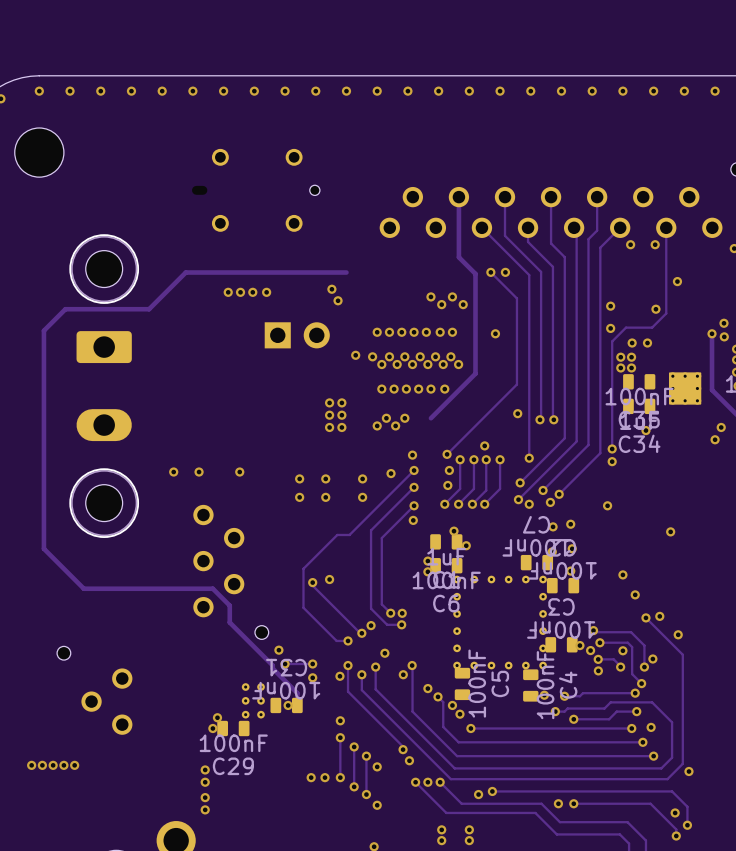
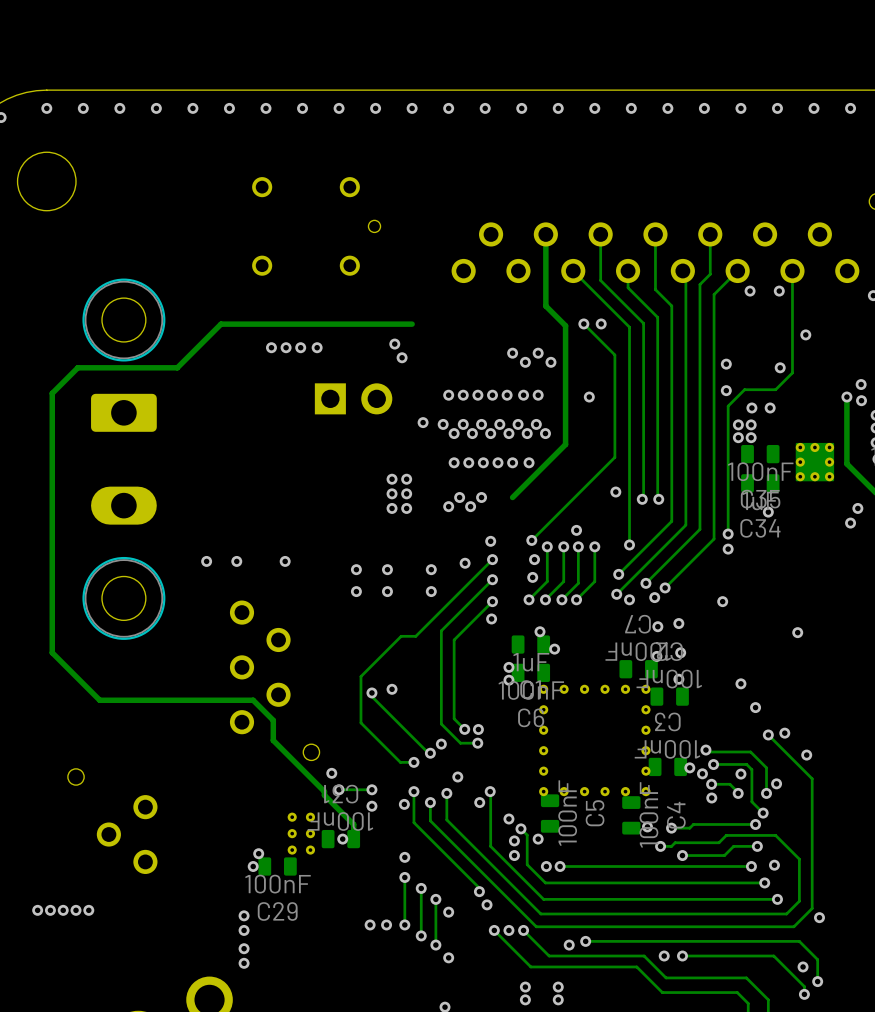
via: none -> (514, 840)
via: (459, 714) -> none
via: none -> (514, 855)
via: none -> (546, 866)

